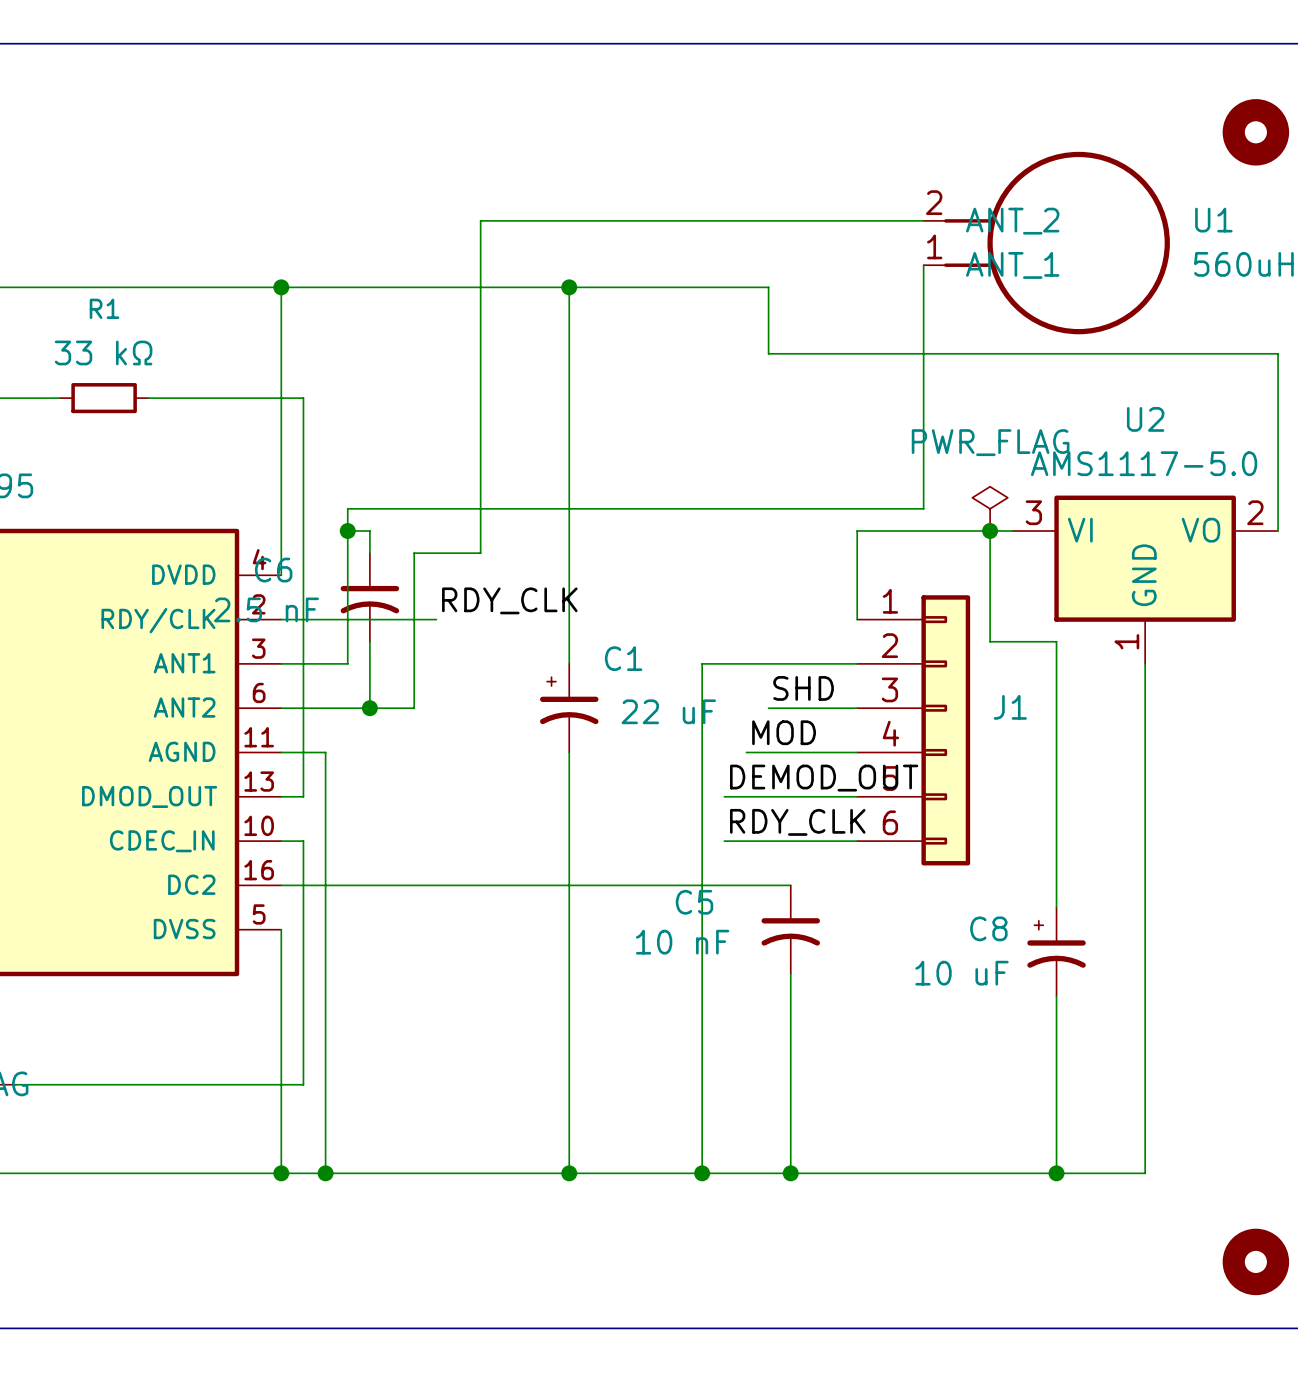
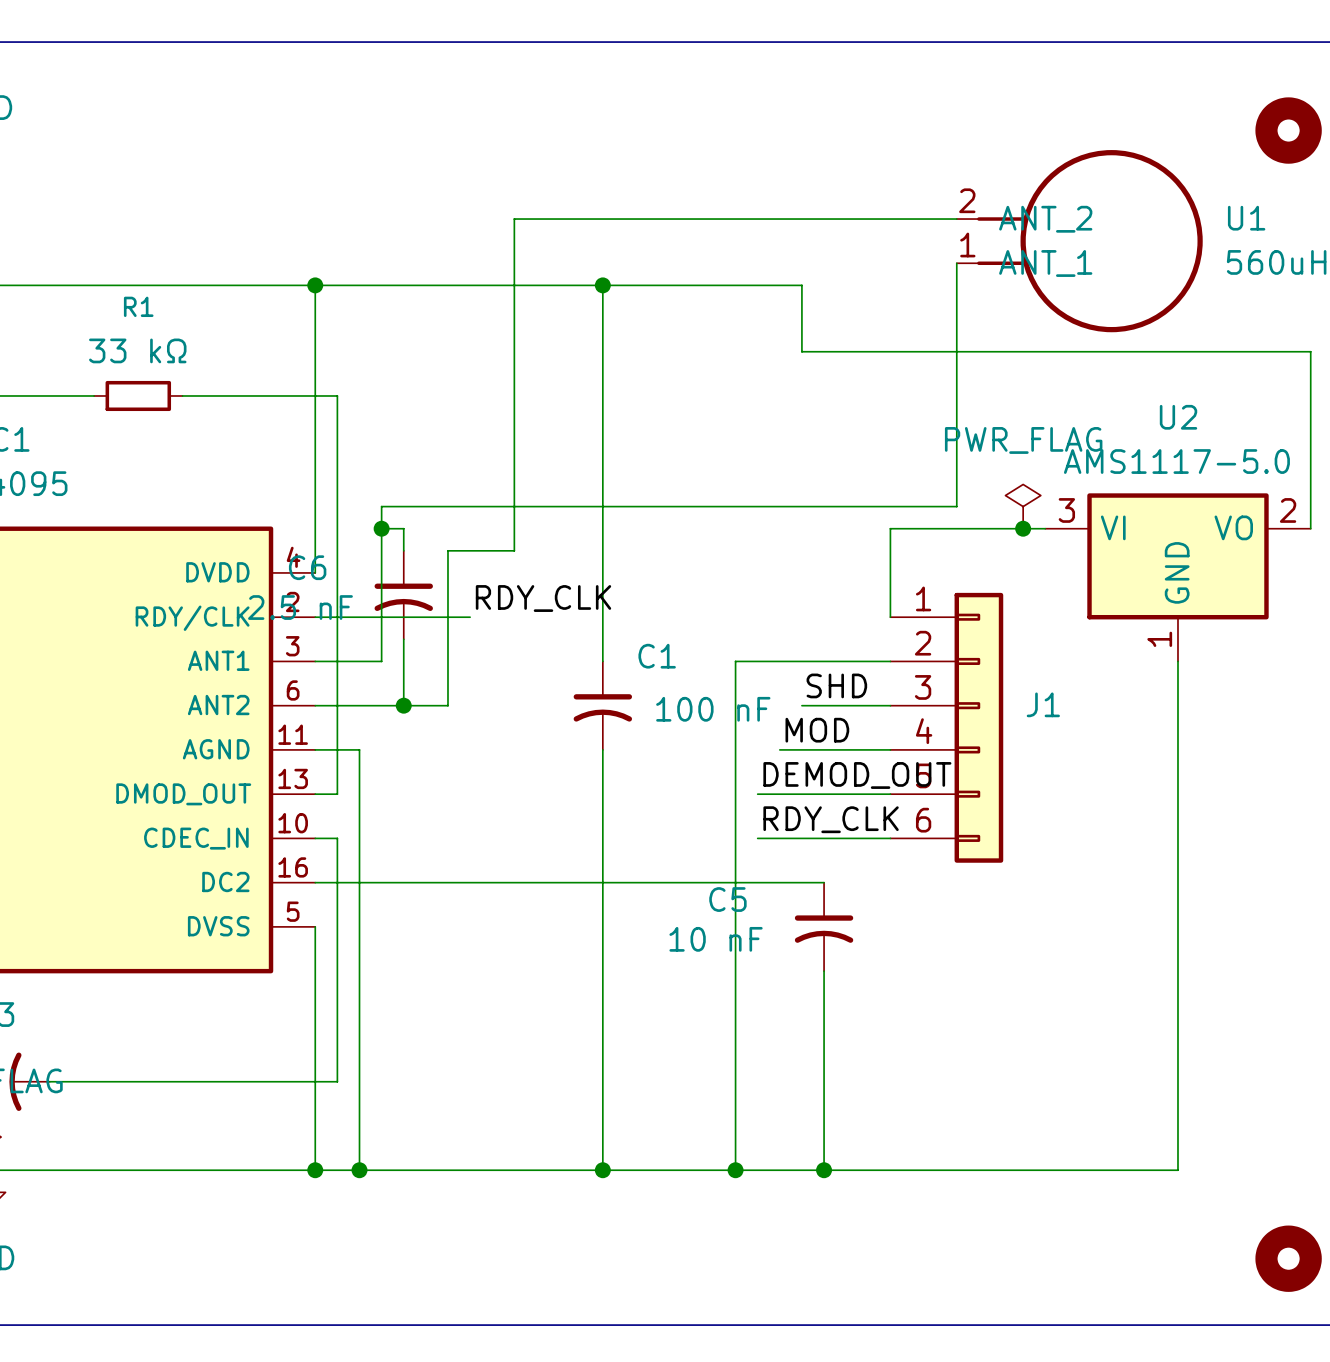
wire: (990, 531) (990, 641) (1056, 641) (1056, 907) -> none
C1 symbol: [540, 663, 599, 753] -> [573, 661, 633, 750]
C1 value: 22 uF (668, 711) -> 100 nF (713, 709)
C8: 10 uF (1056, 951) -> none
wire: (1056, 996) (1056, 1173) -> none
junction: (1056, 1173) -> none

